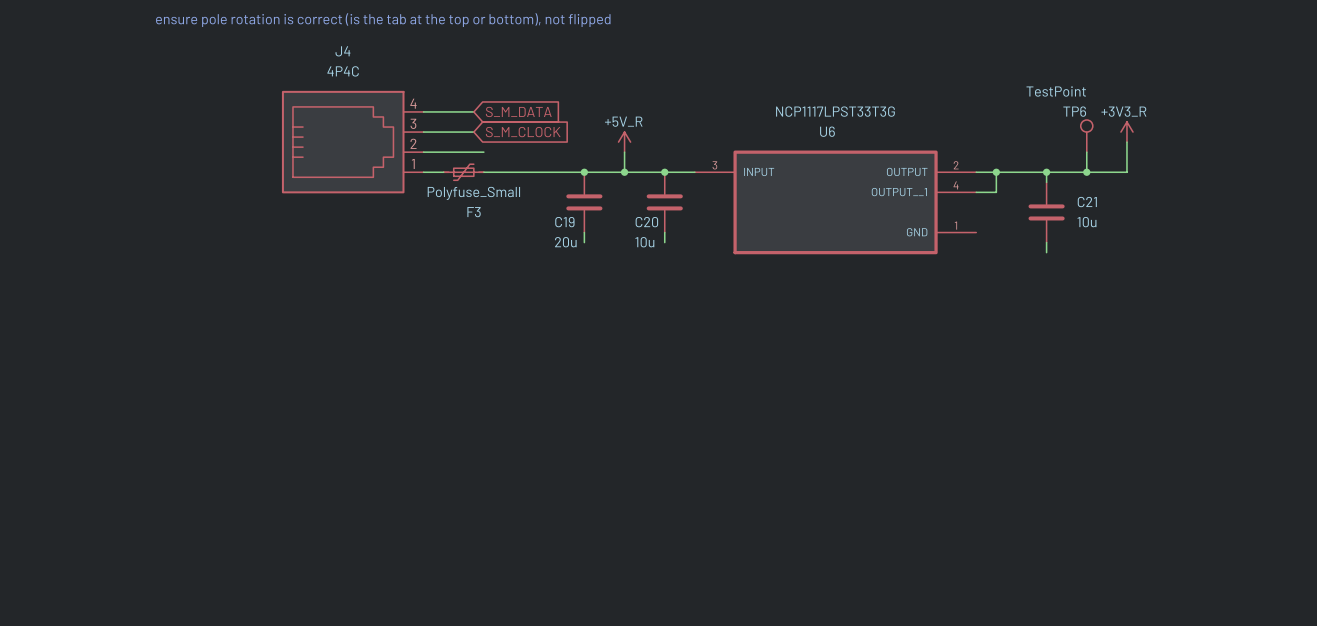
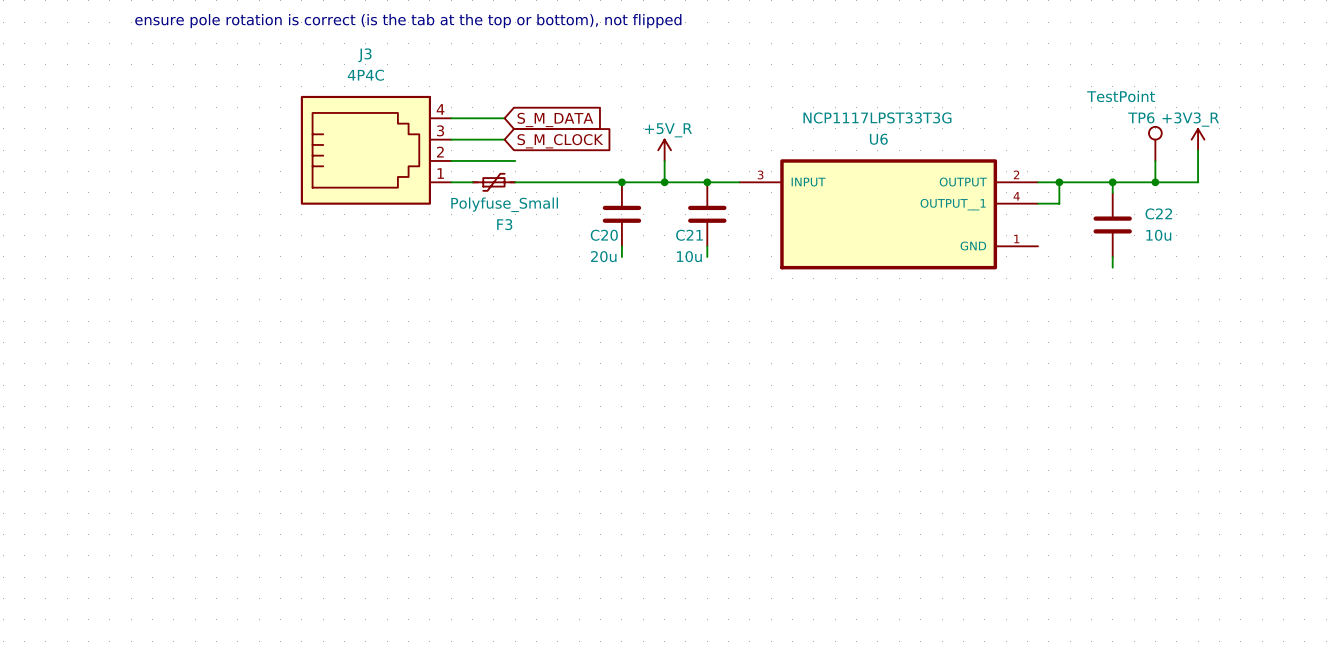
J4 name: J4 (342, 51) -> J3 (364, 55)
C21 name: C21 (1087, 202) -> C22 (1158, 213)
C19 name: C19 (564, 222) -> C20 (604, 235)
C20 name: C20 (646, 222) -> C21 (689, 235)

